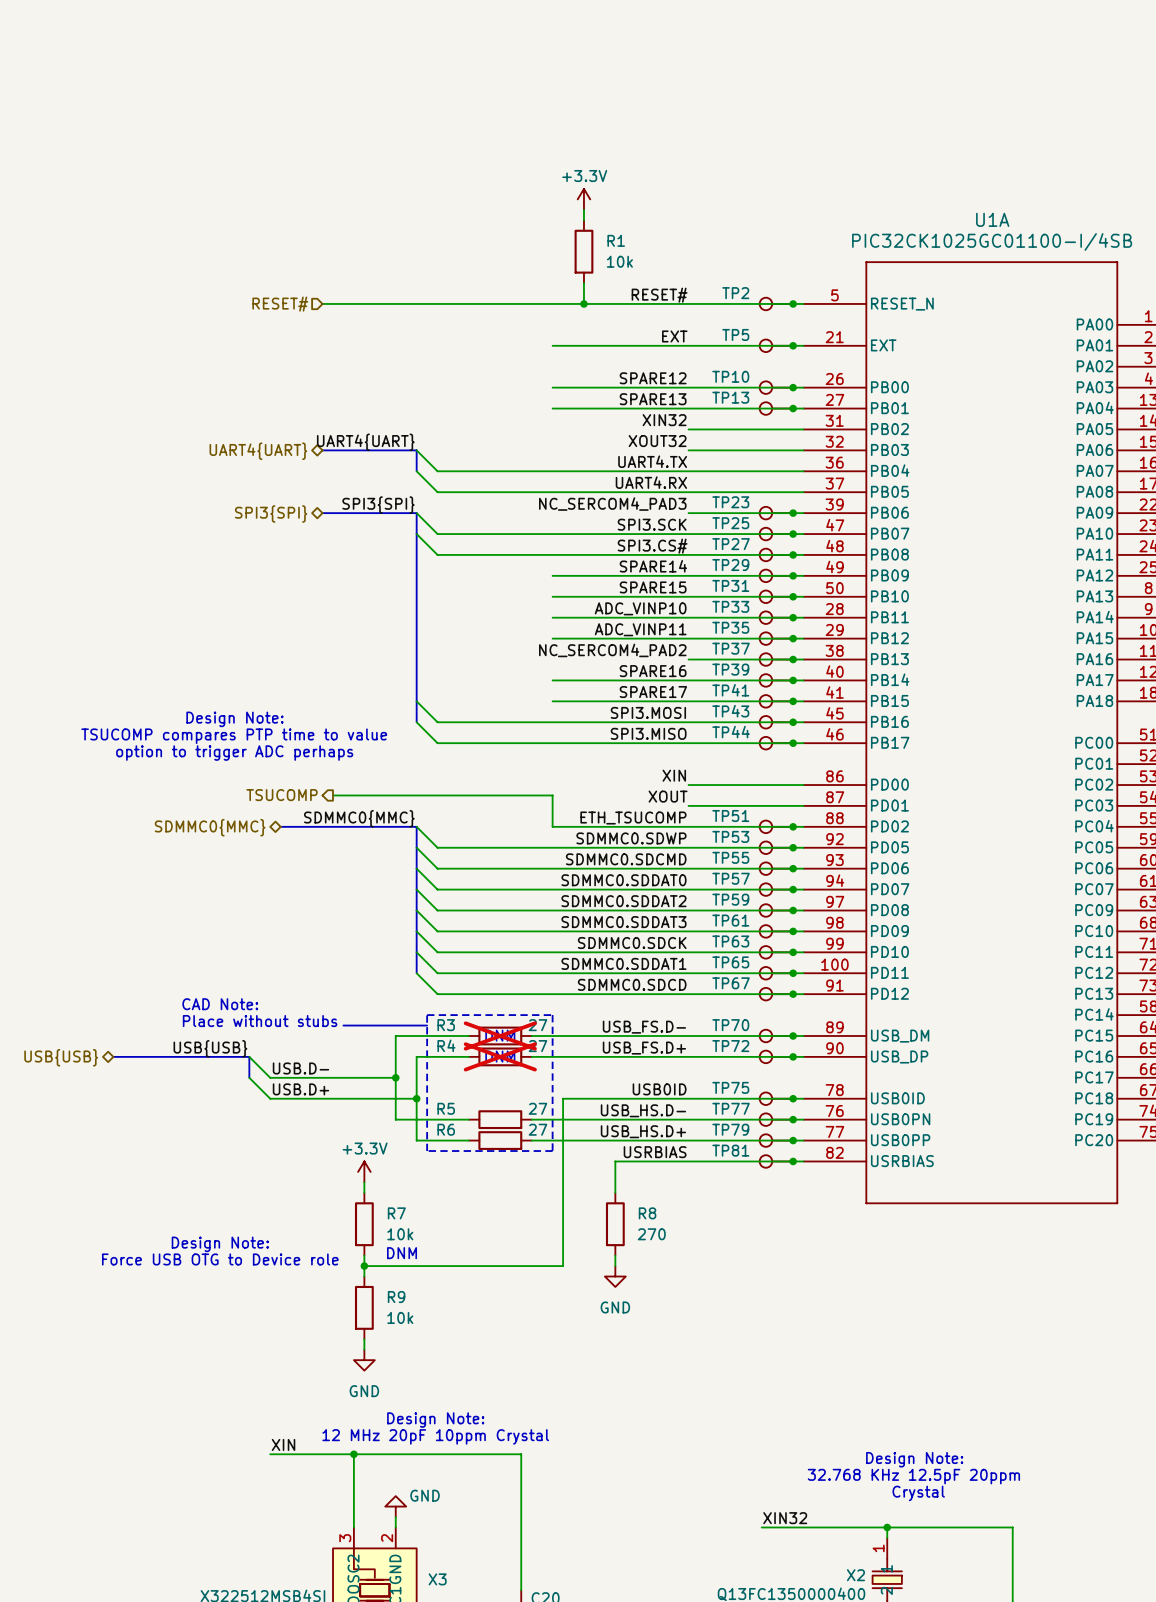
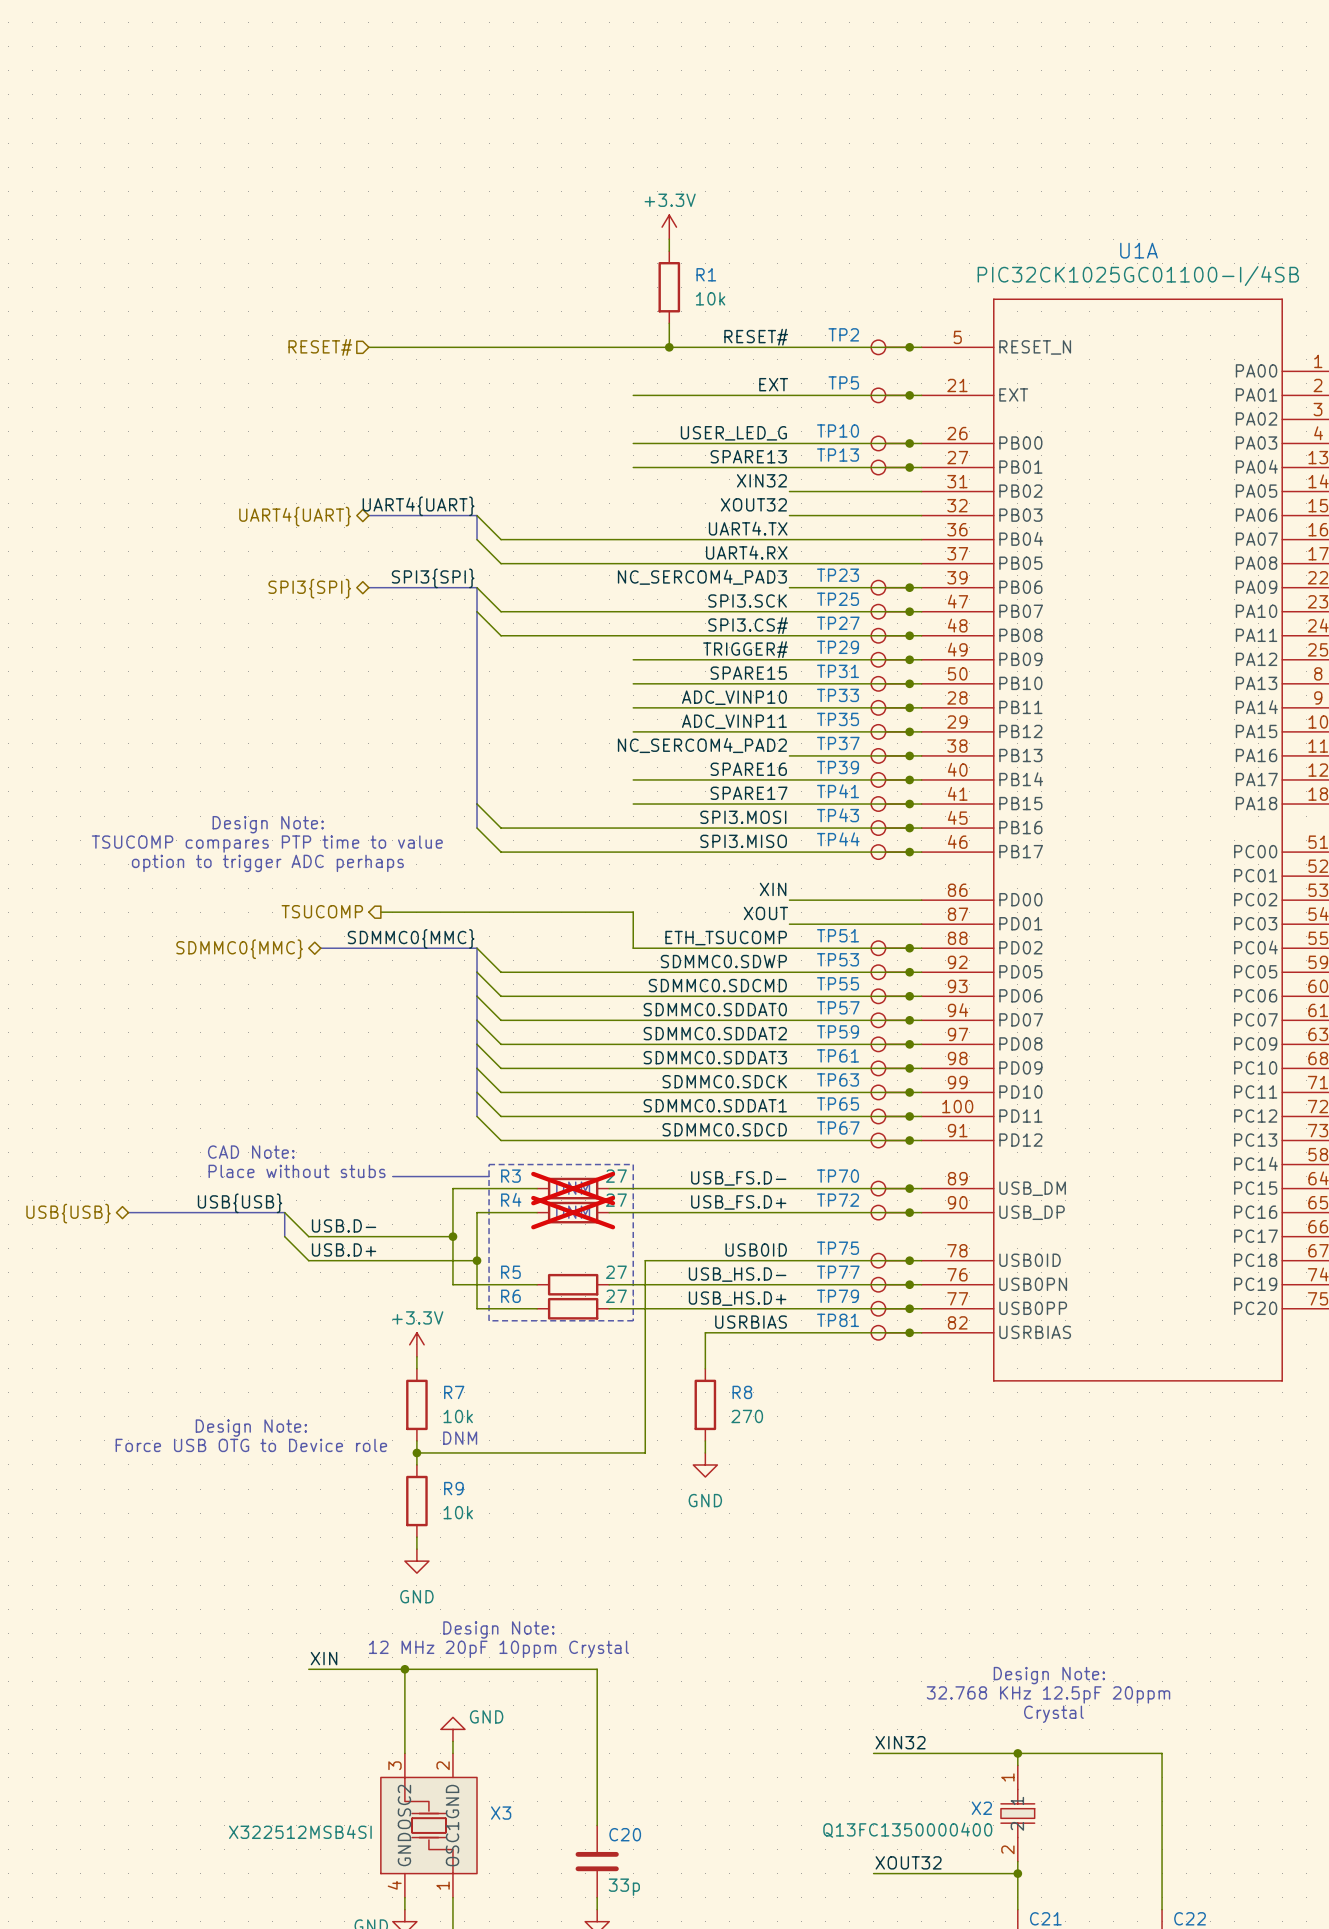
label: SPARE12 (653, 378) -> USER_LED_G (733, 433)
label: SPARE14 (653, 566) -> TRIGGER# (745, 649)

